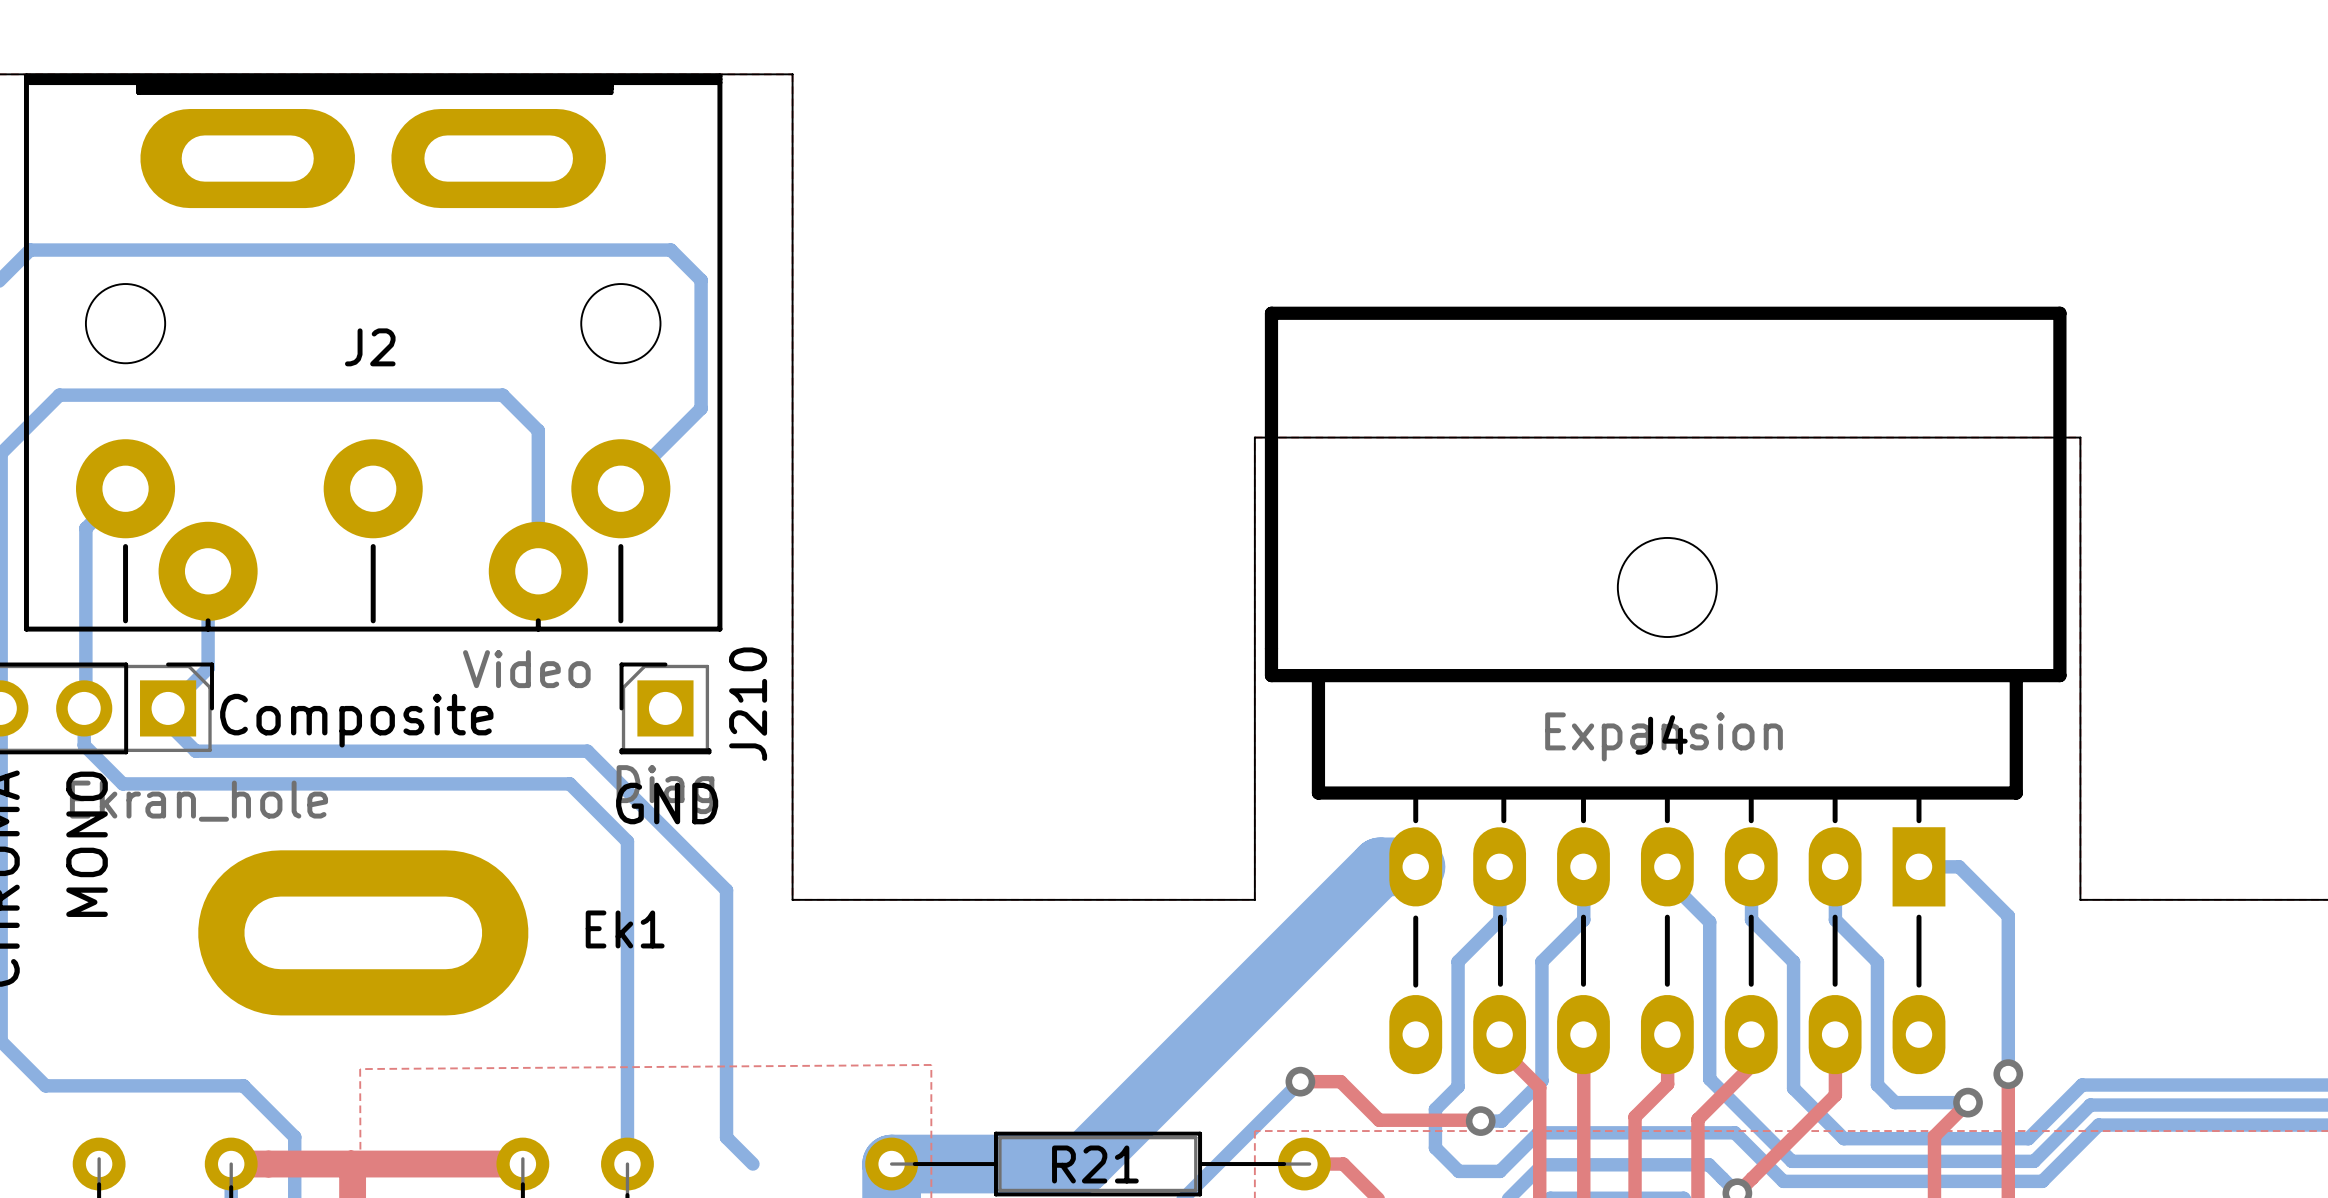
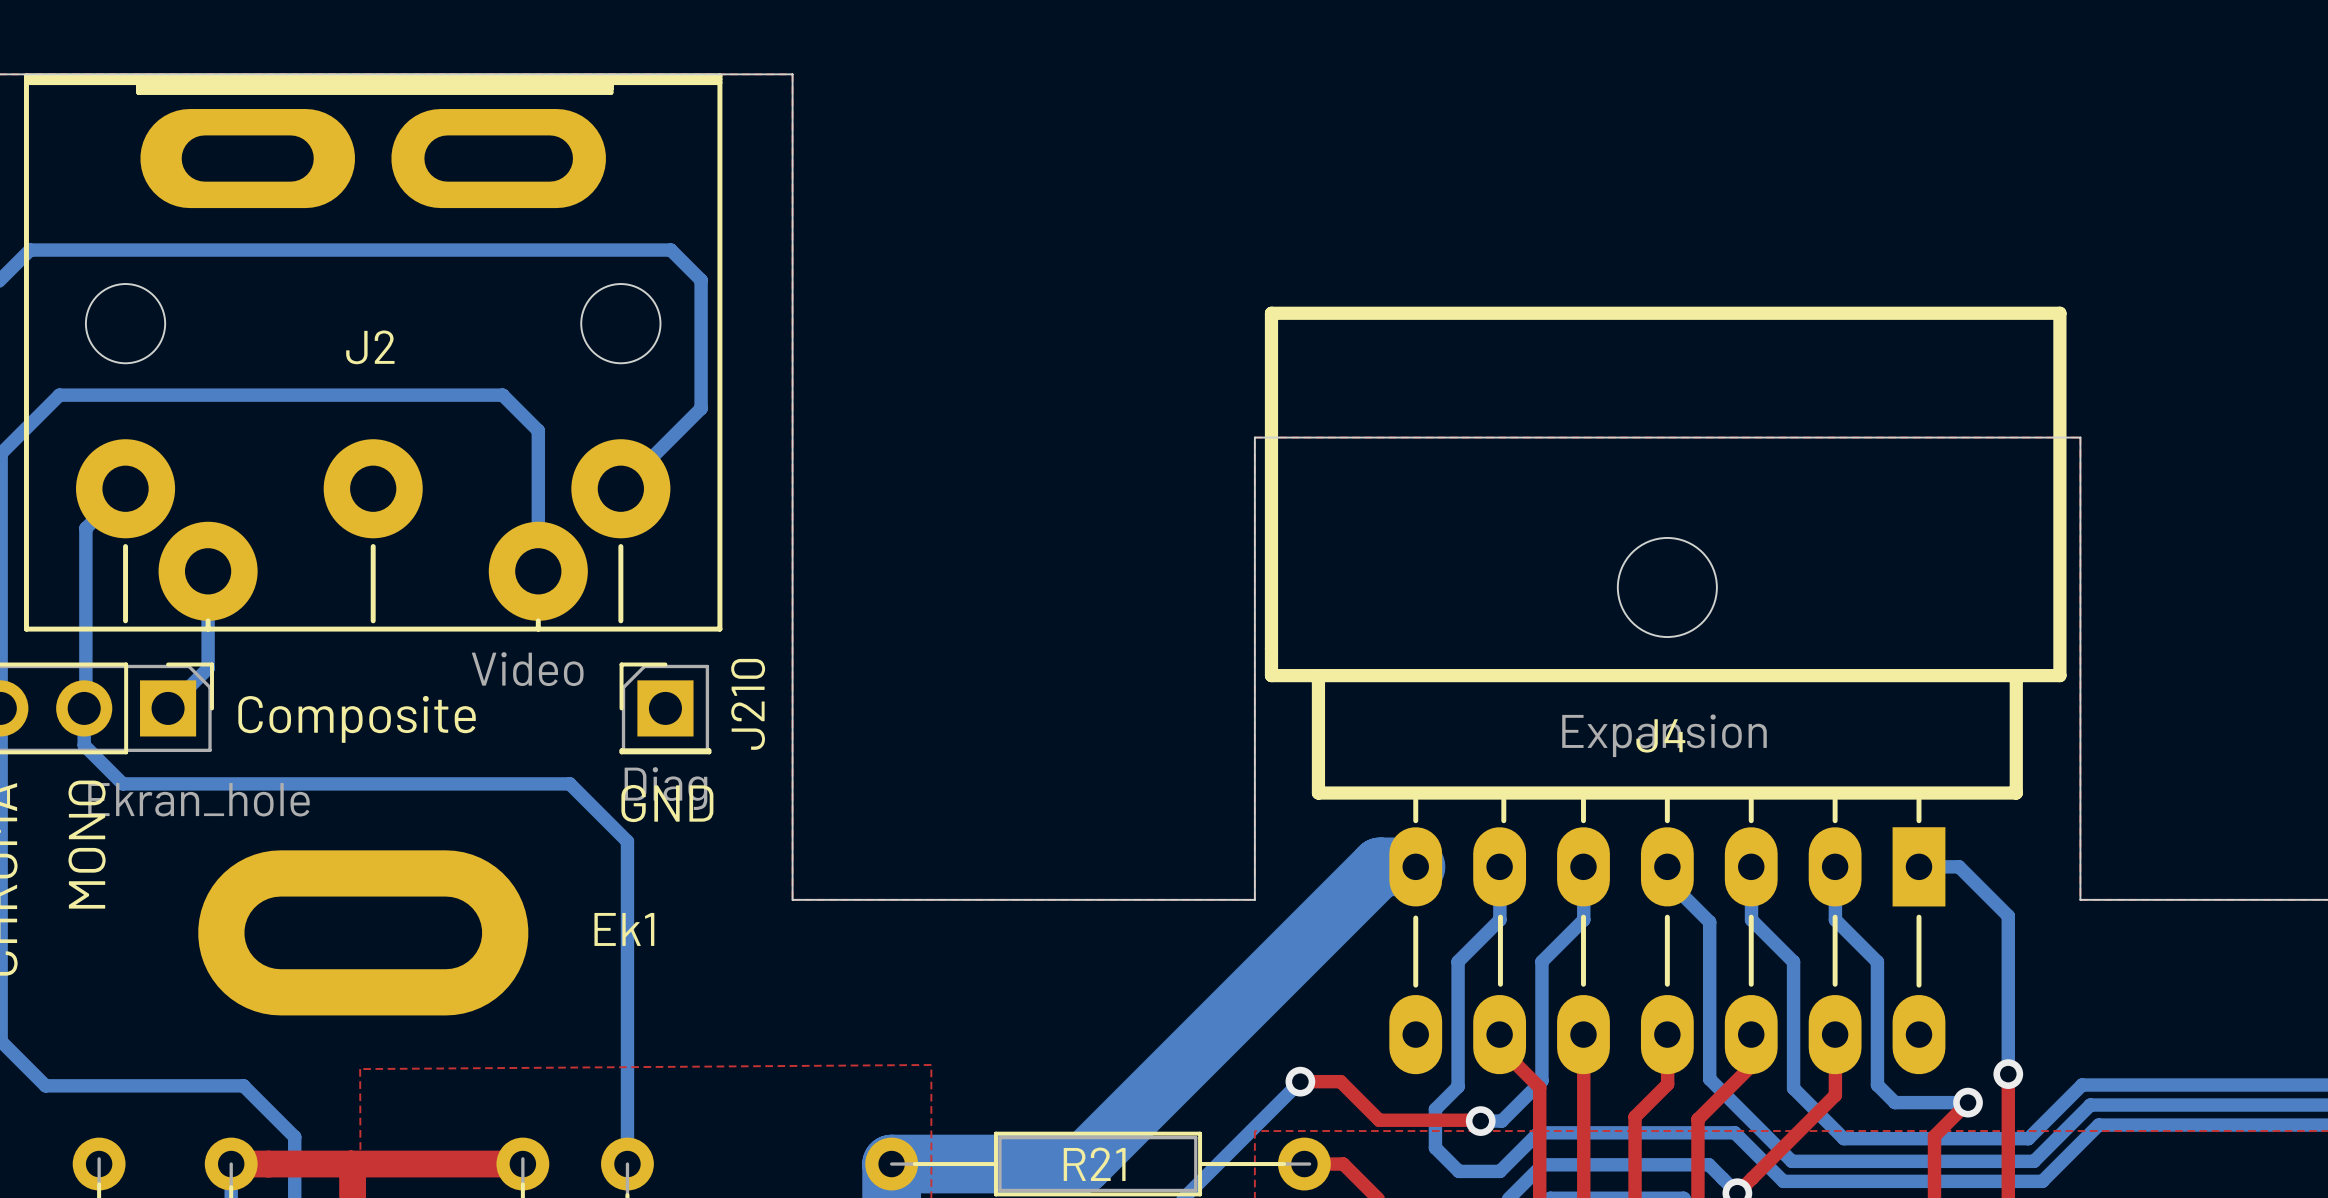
bottom track: (168, 708) (168, 723) (195, 751) (587, 751) (726, 890) (726, 1137) (752, 1164) -> none

